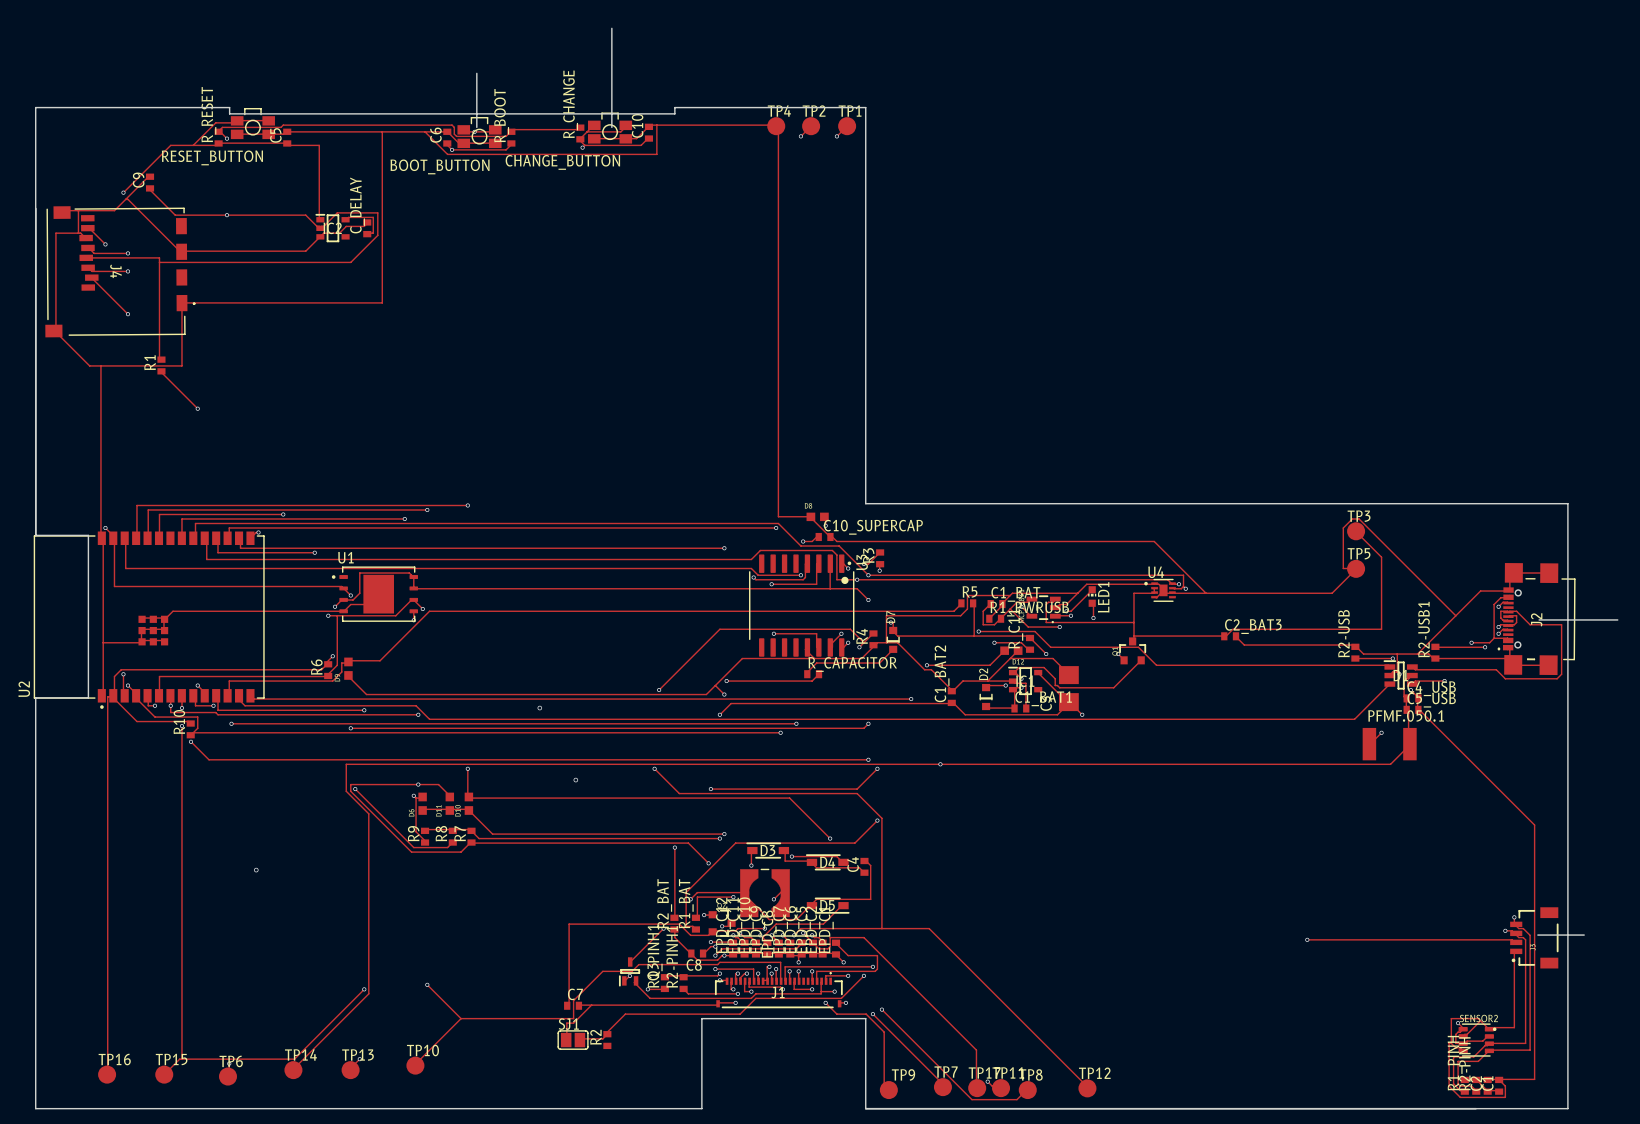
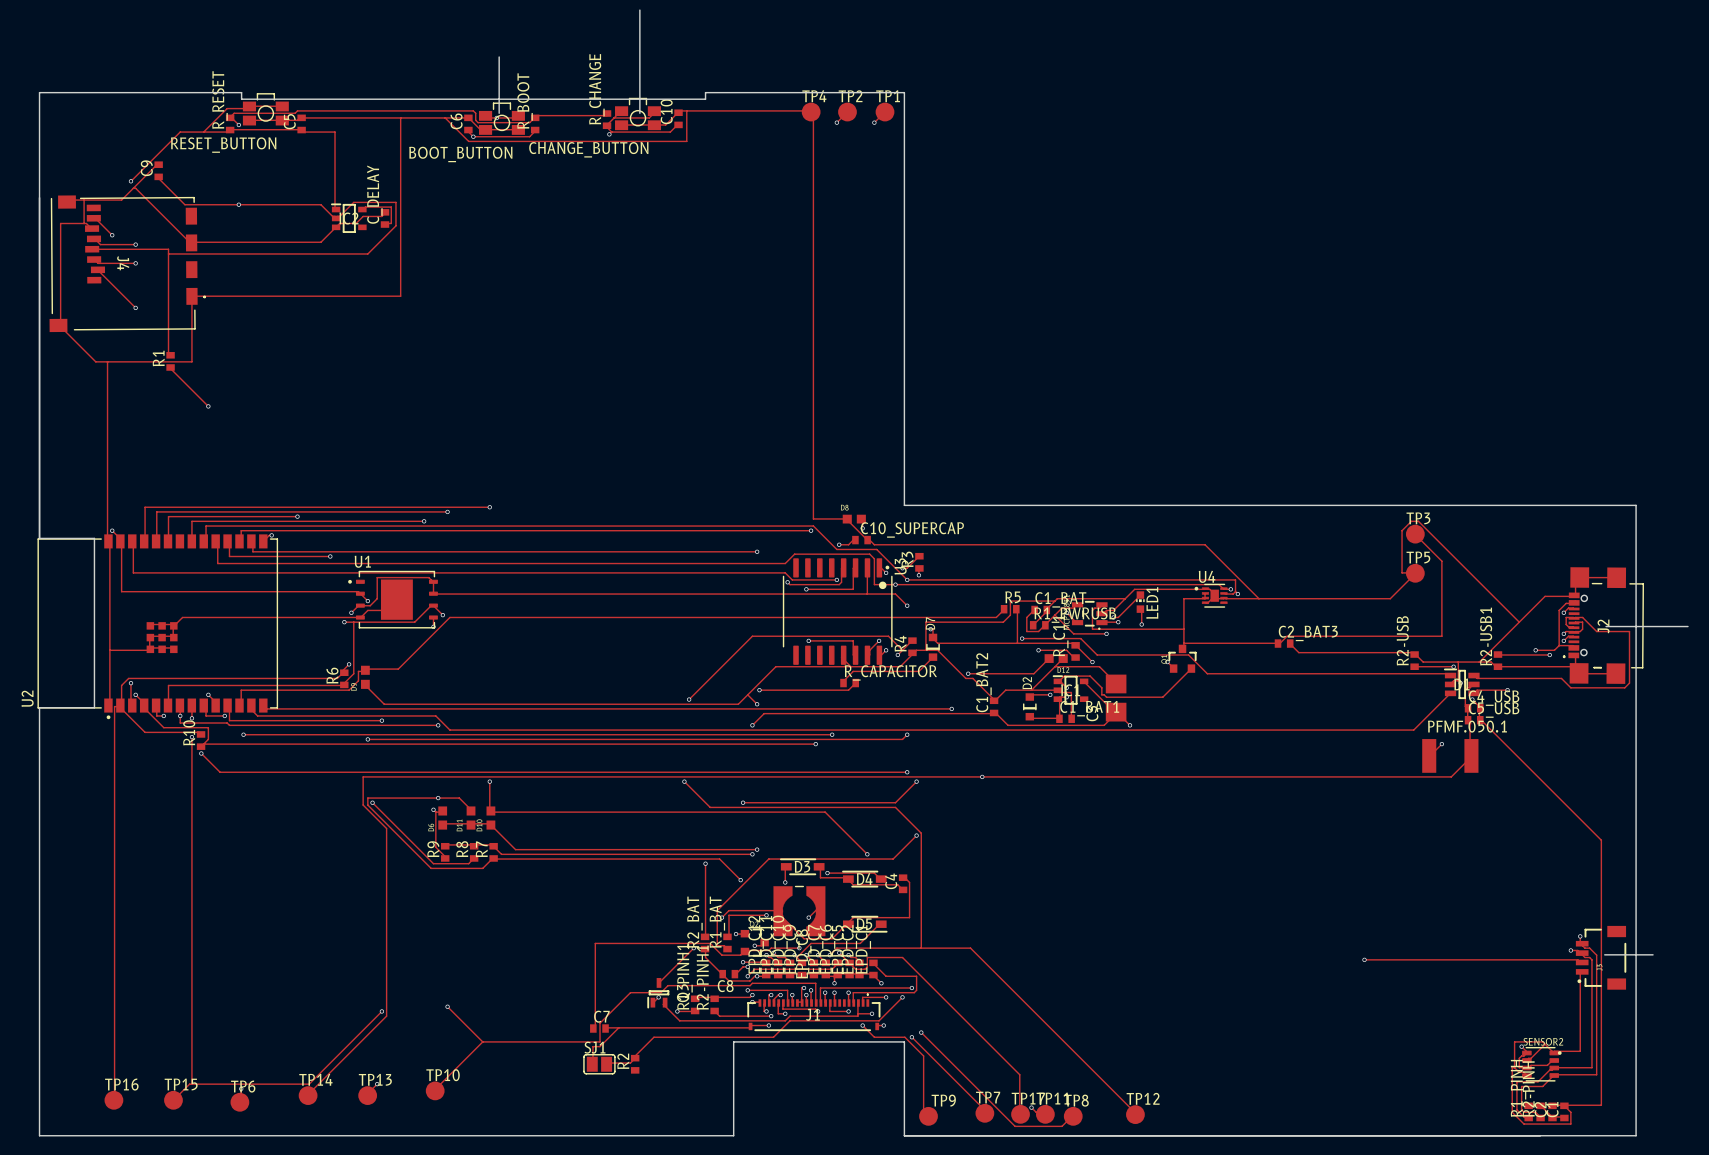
via: (539, 708) -> none
via: (575, 780) -> none
via: (256, 870) -> none

